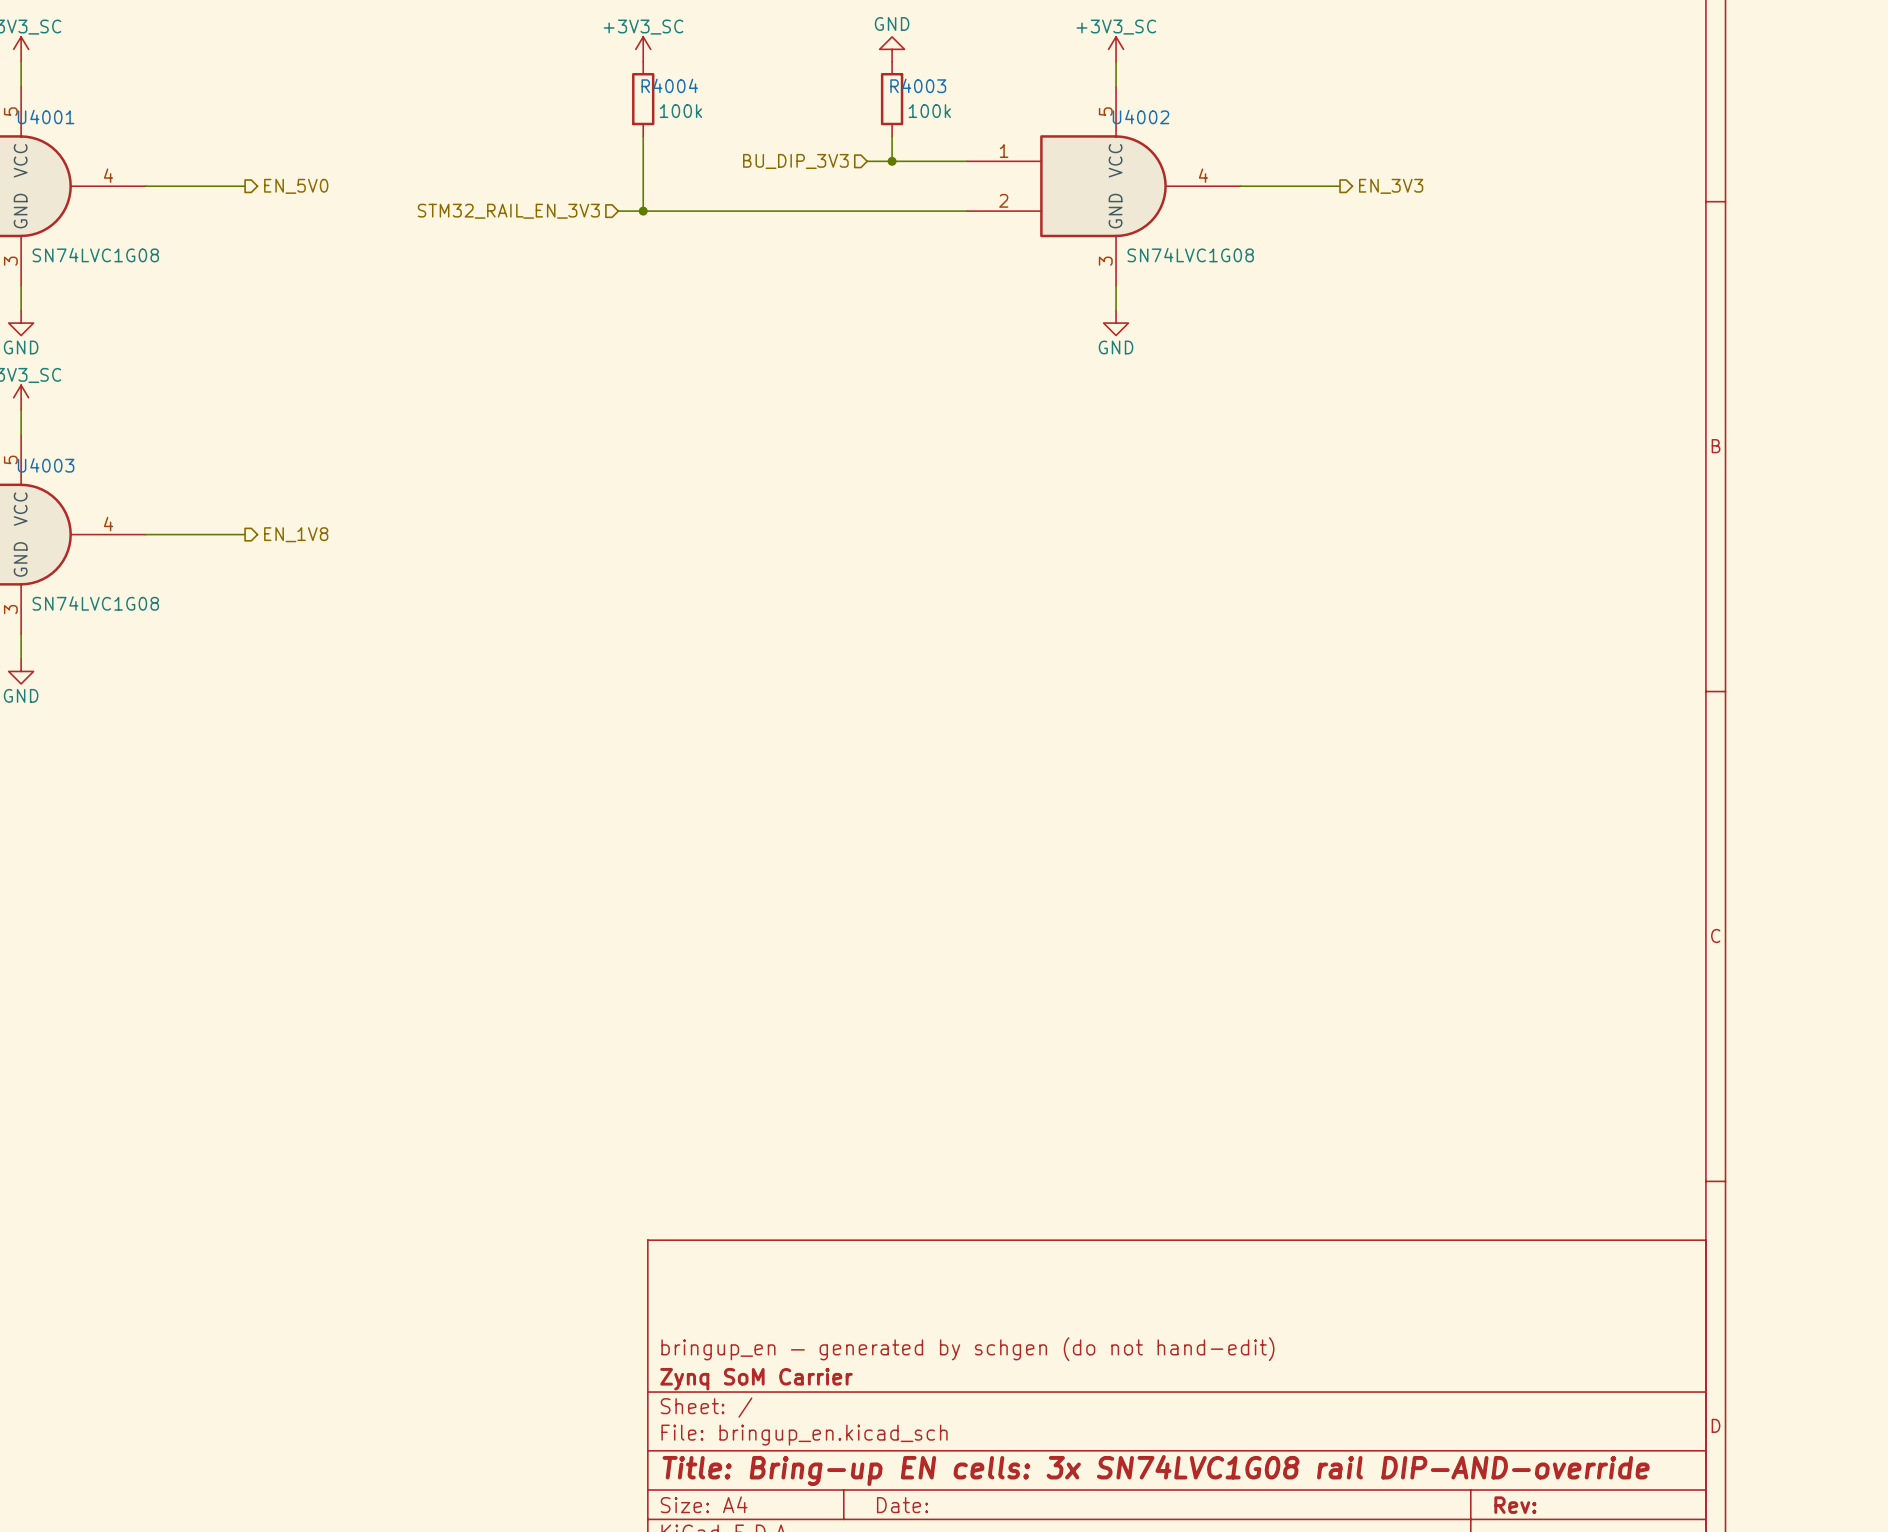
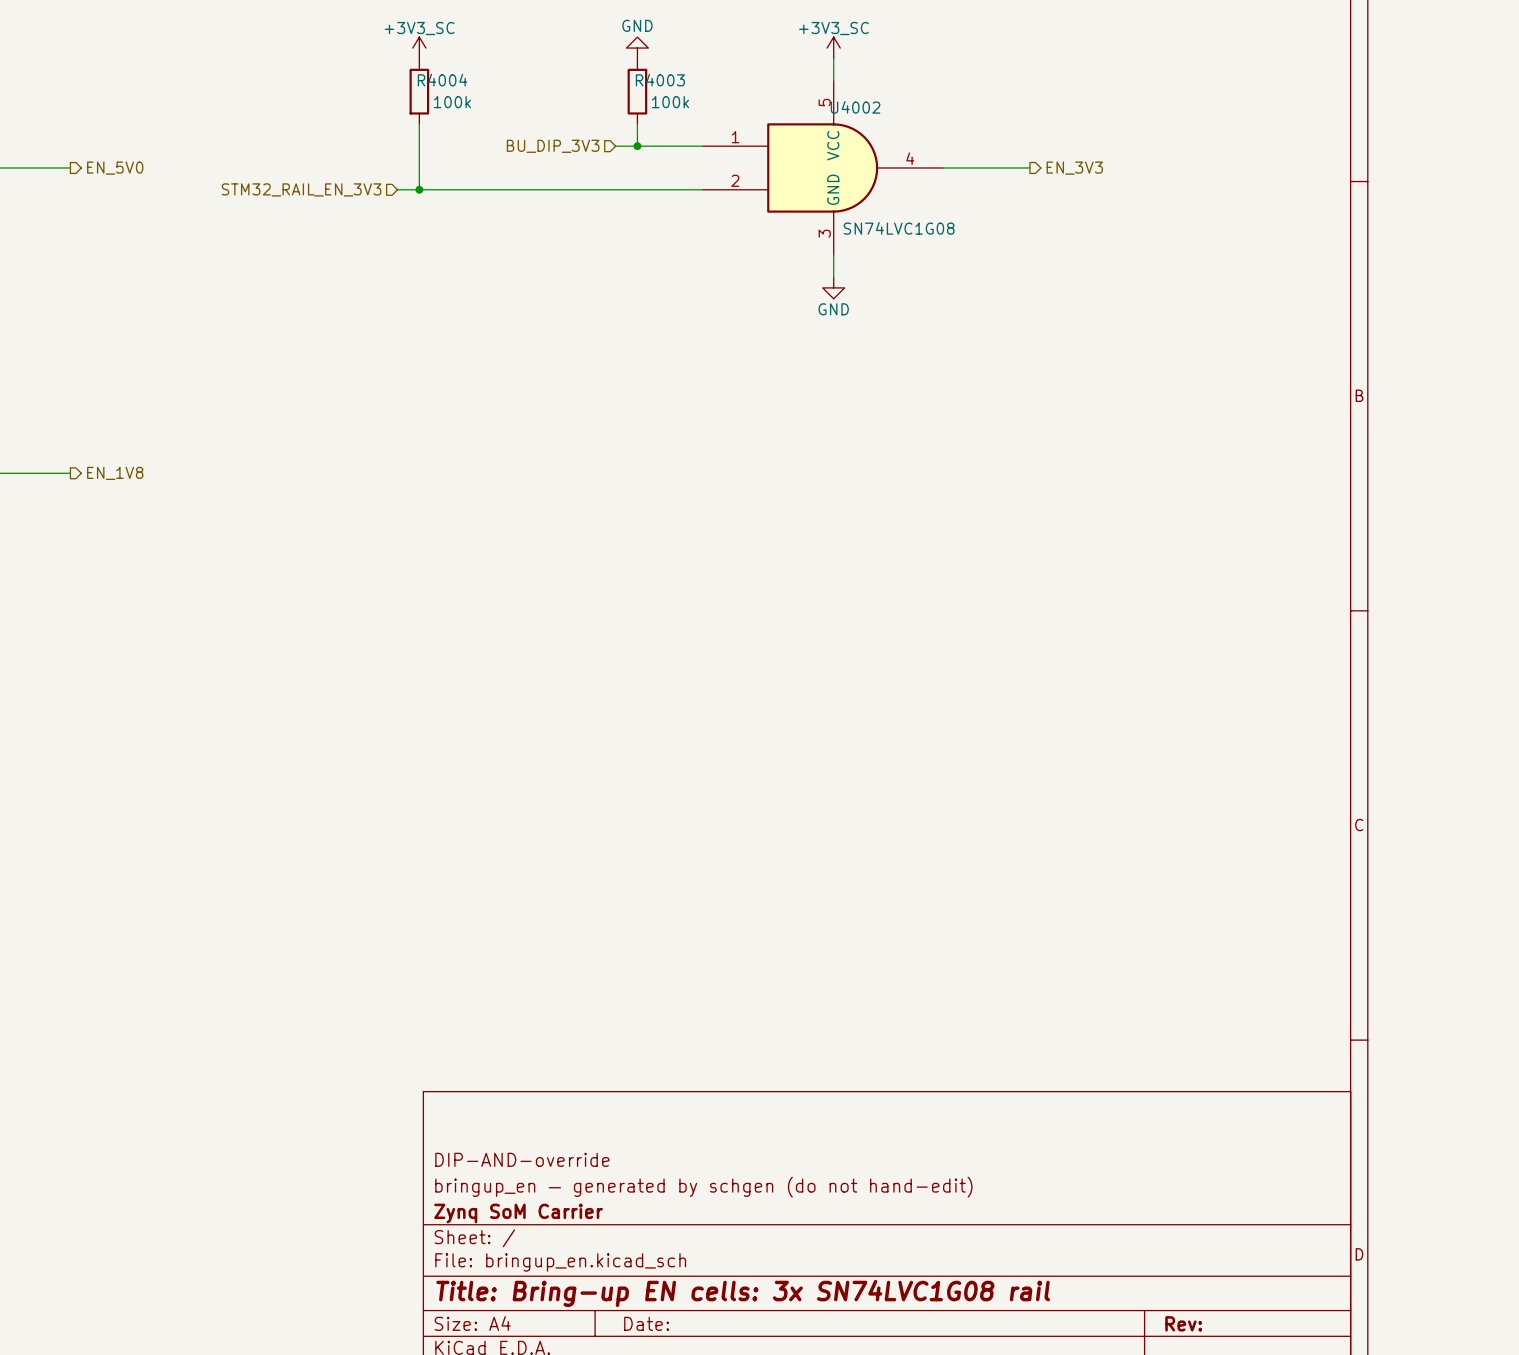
title block: none -> DIP-AND-override (522, 1159)
title block: Title: Bring-up EN cells: 3x SN74LVC1G08 rail DIP-AND-override (1156, 1470) -> Title: Bring-up EN cells: 3x SN74LVC1G08 rail (743, 1293)

